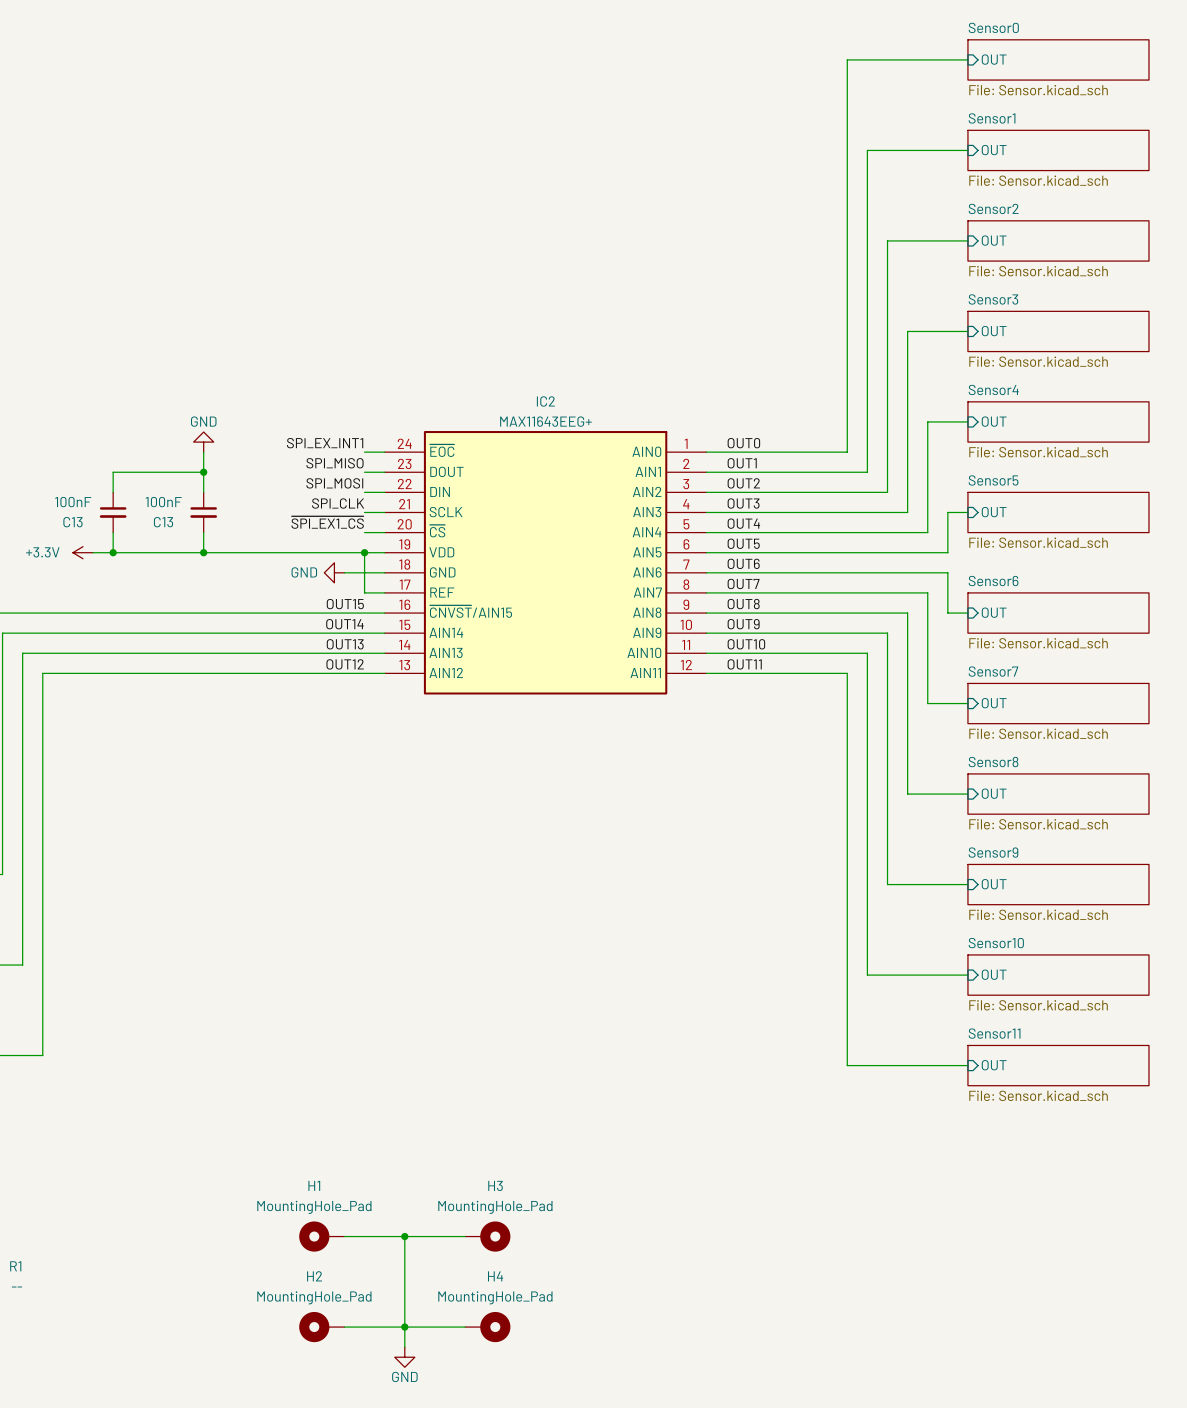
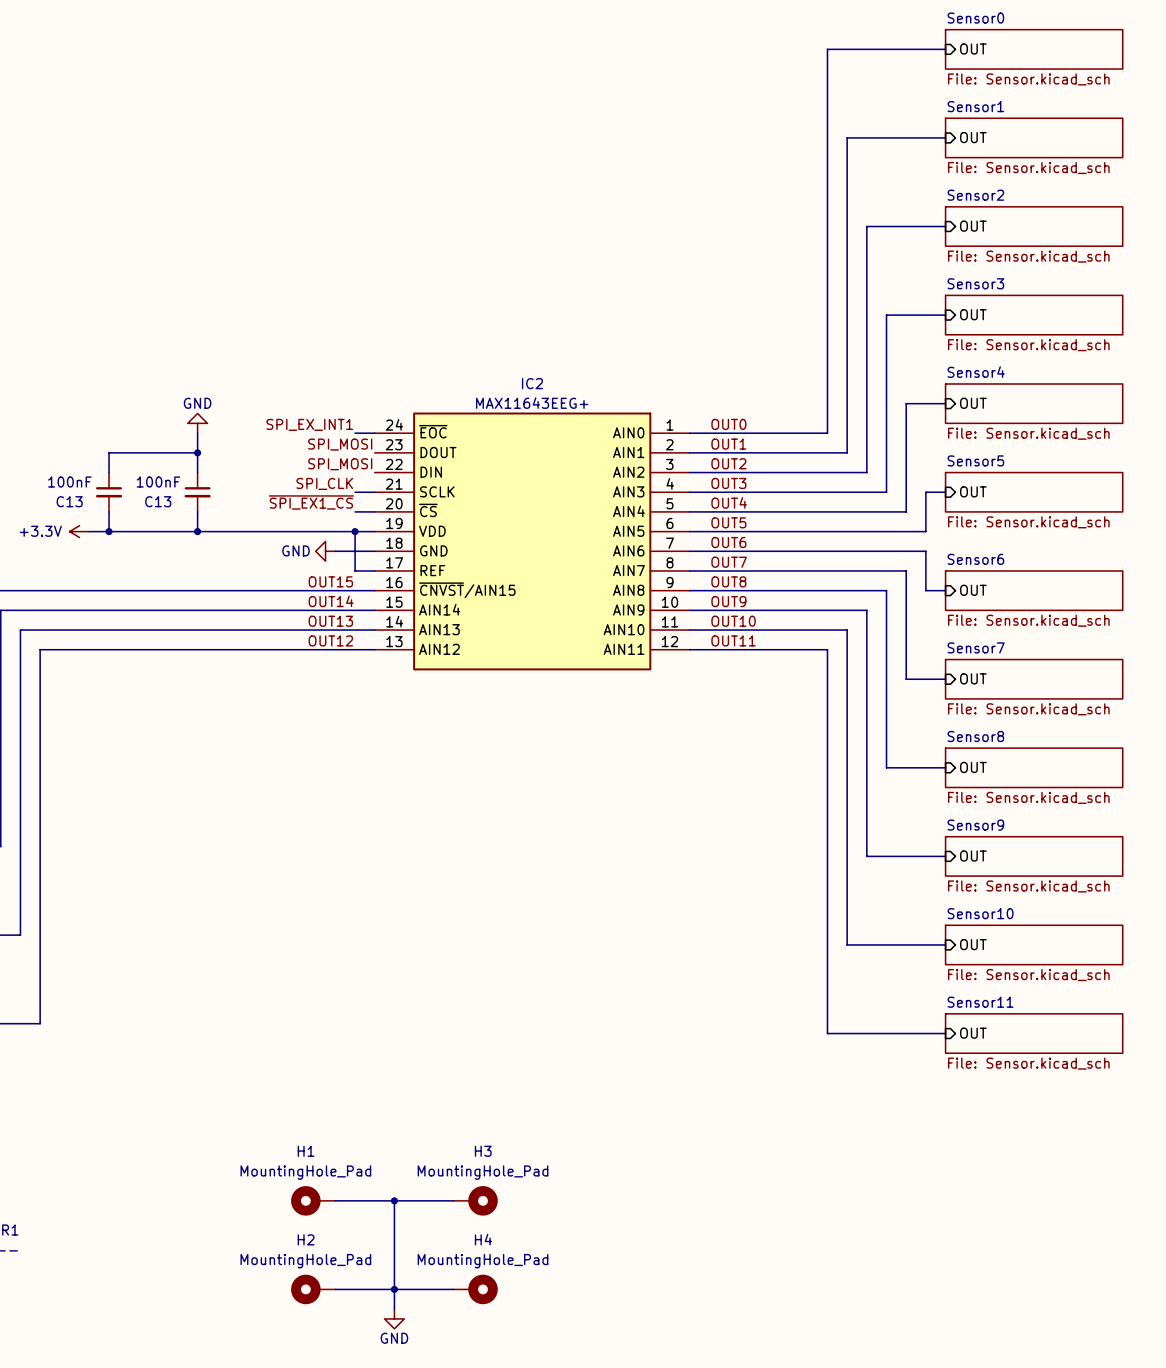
label: SPI_MISO (334, 463) -> none
label: none -> SPI_MOSI (340, 444)
wire: (364, 472) (384, 472) -> none
label: SPI_MOSI (334, 483) -> none
label: none -> SPI_MOSI (340, 464)
wire: (364, 492) (384, 492) -> none

